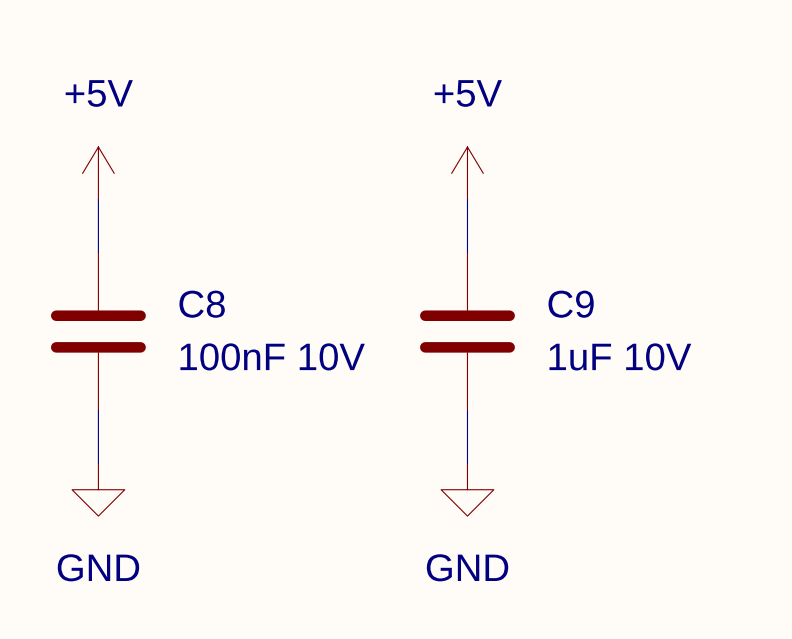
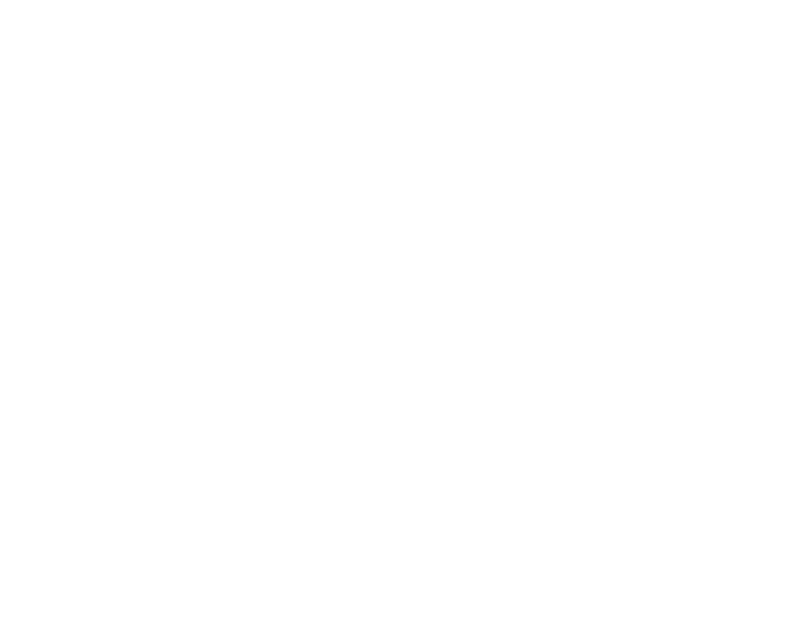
power symbol: +5V (98, 173) -> none
power symbol: +5V (467, 173) -> none
wire: (98, 199) (98, 252) -> none
wire: (467, 199) (467, 252) -> none
C8: 100nF 10V (98, 331) -> none
C9: 1uF 10V (467, 331) -> none
wire: (98, 410) (98, 463) -> none
wire: (467, 410) (467, 463) -> none
power symbol: GND (98, 489) -> none
power symbol: GND (467, 489) -> none

